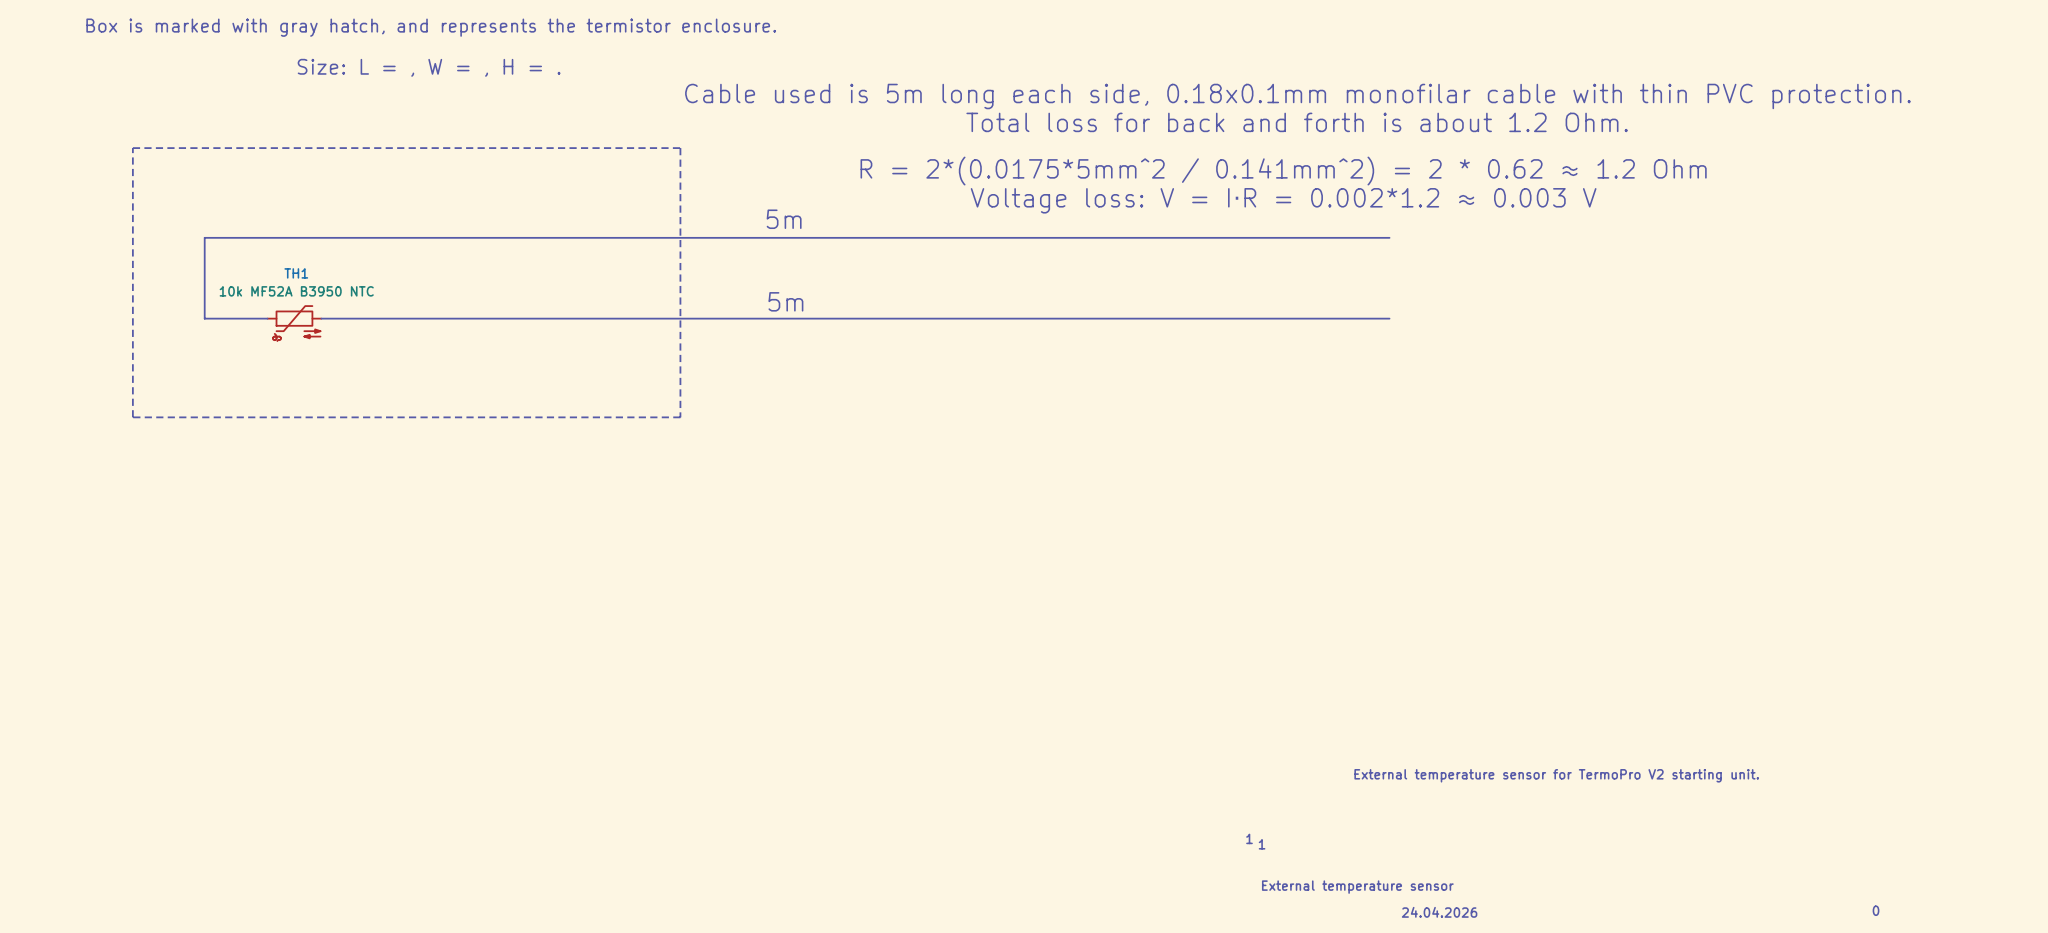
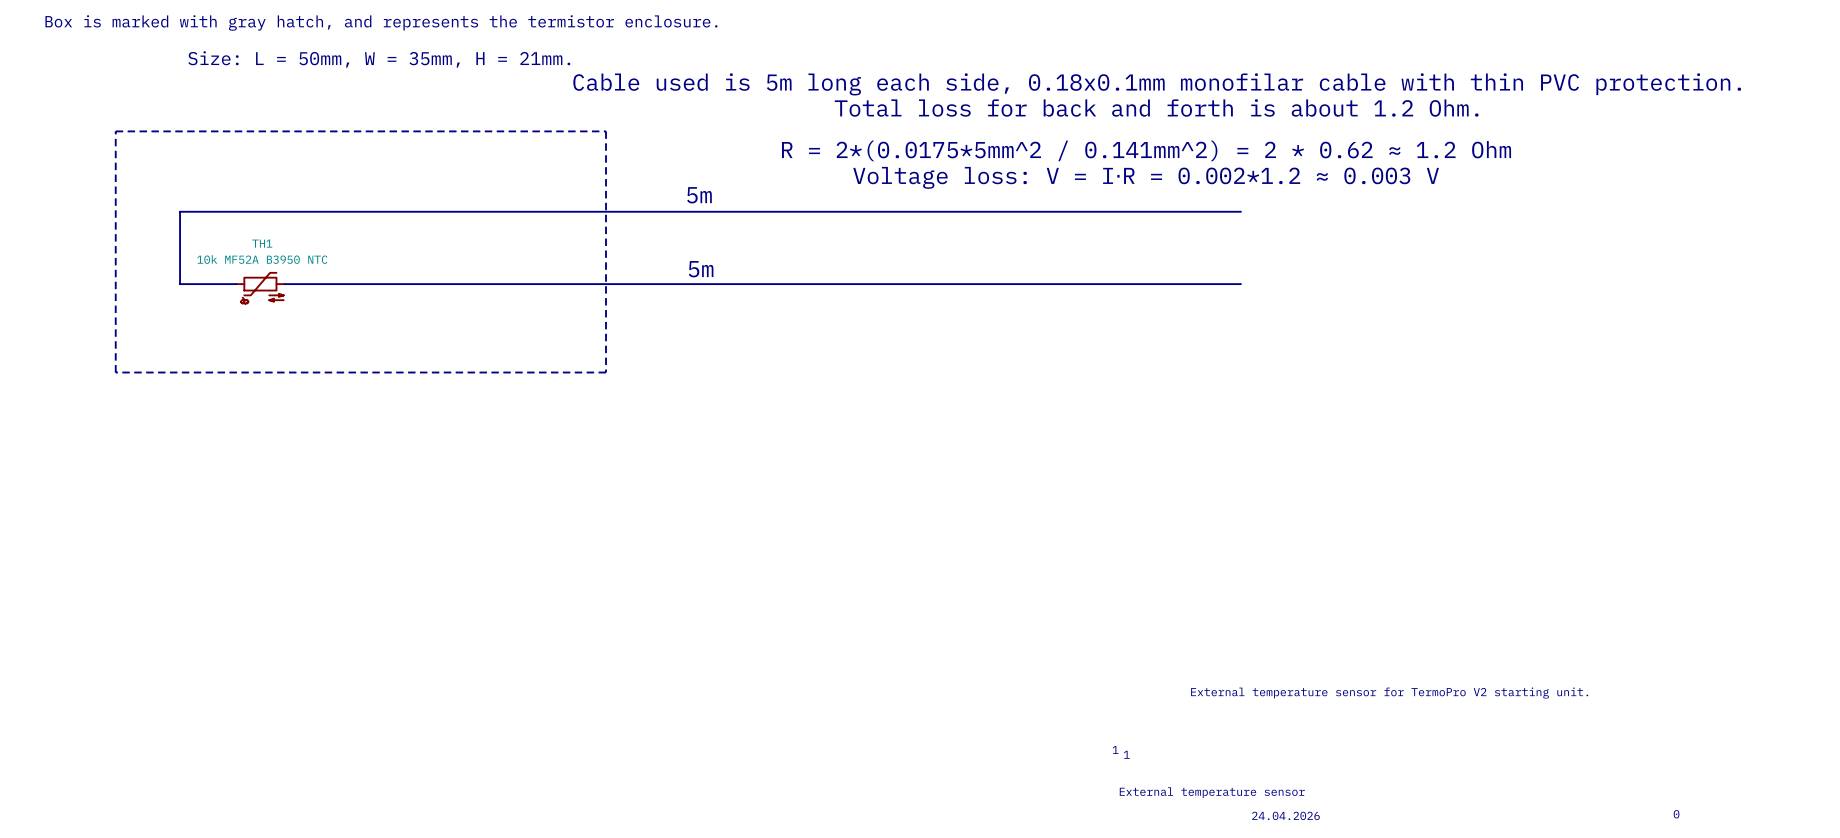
text: Size: L = , W = , H = . (429, 67) -> Size: L = 50mm, W = 35mm, H = 21mm. (379, 59)

